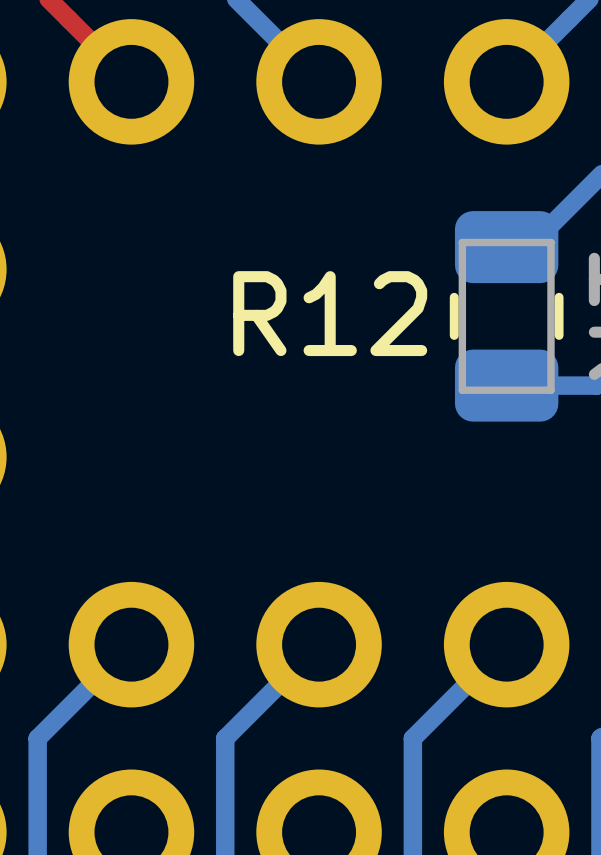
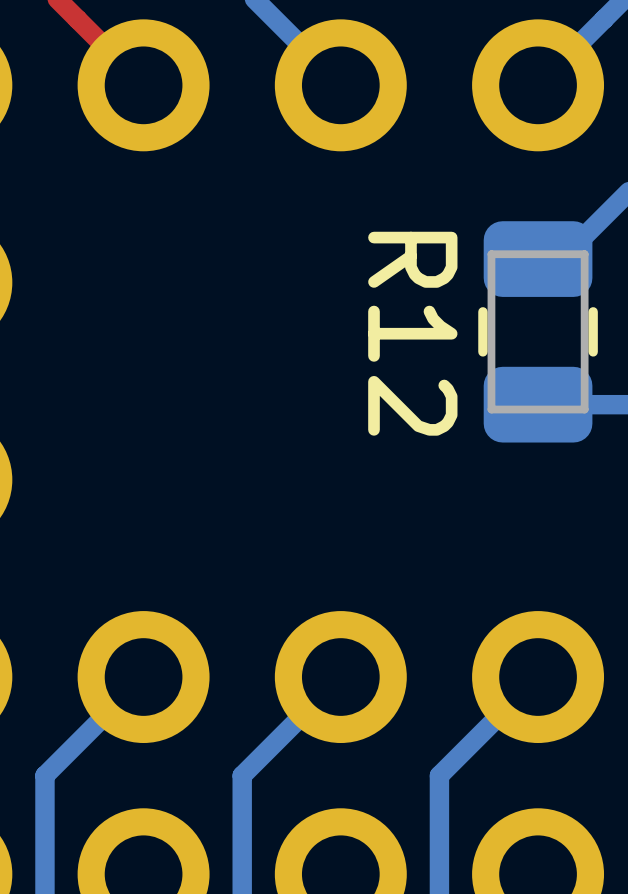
R12 name rotation: 0° (330, 313) -> 90° clockwise (412, 333)

